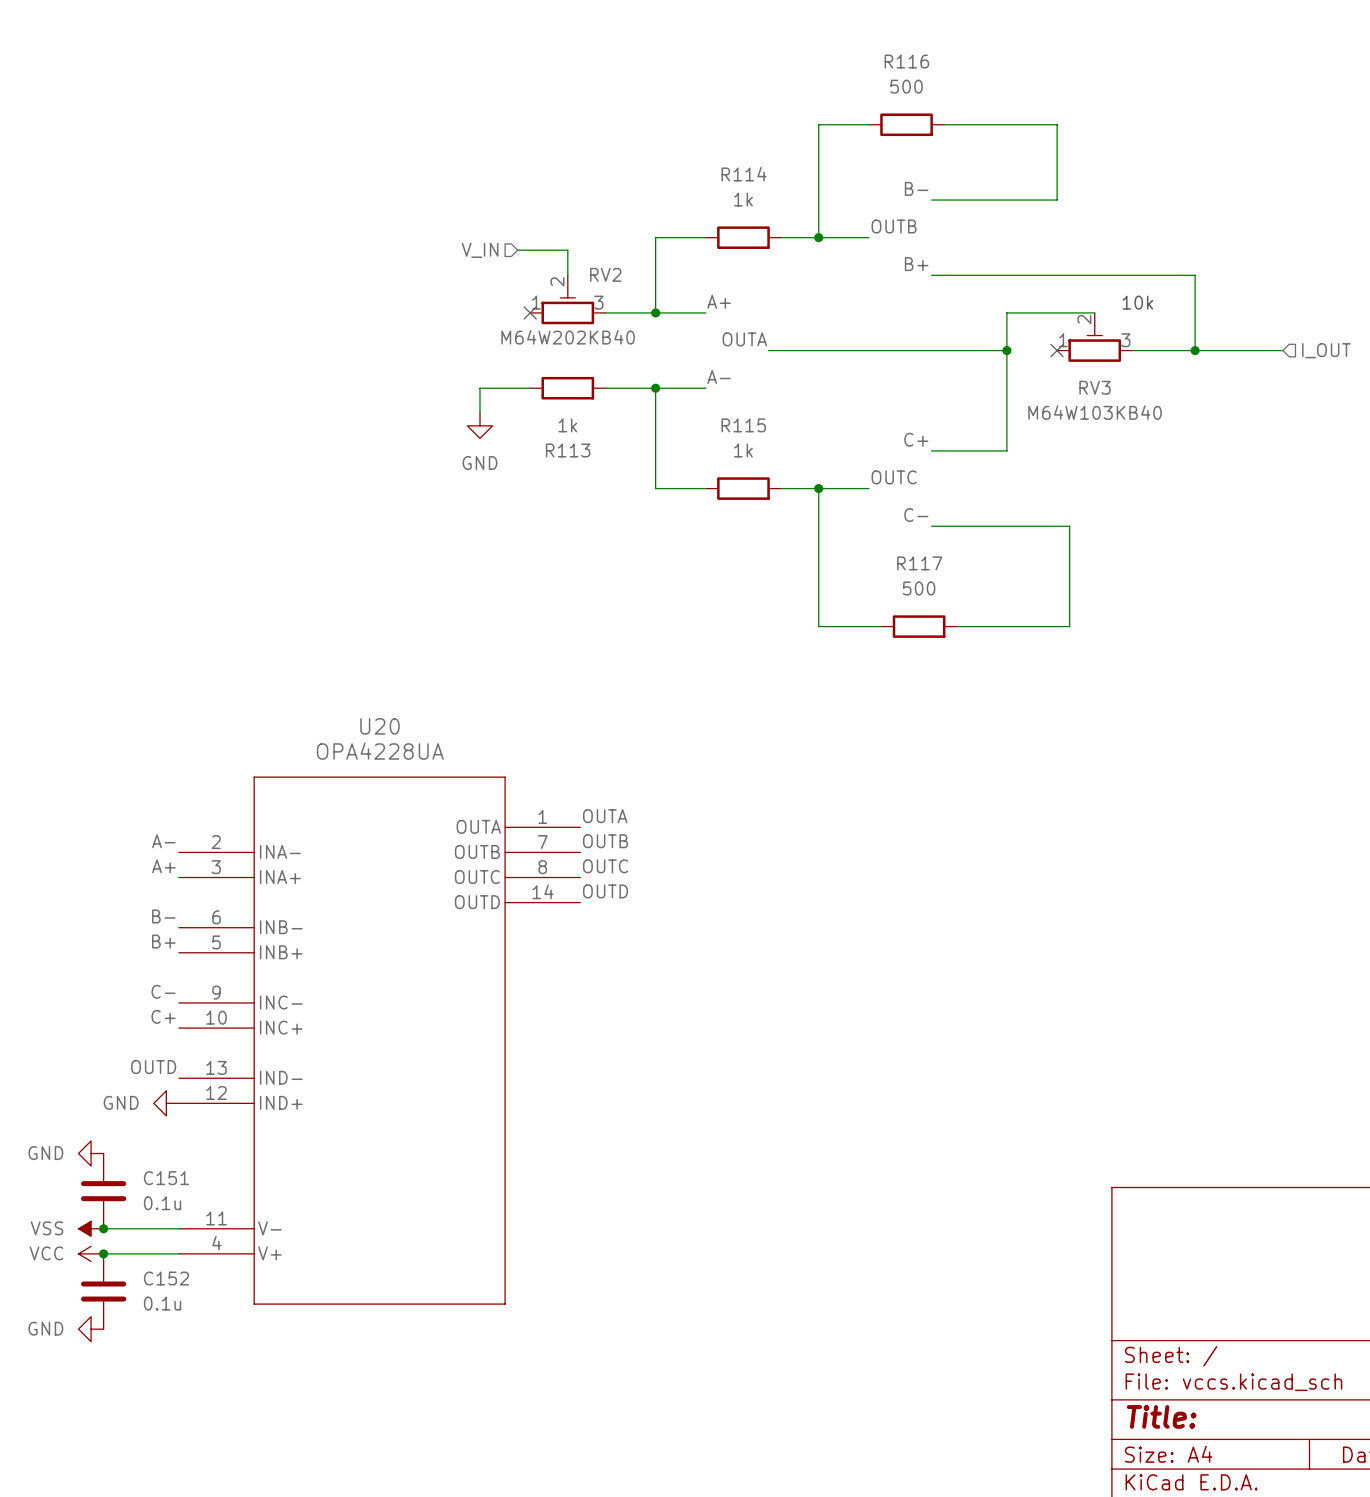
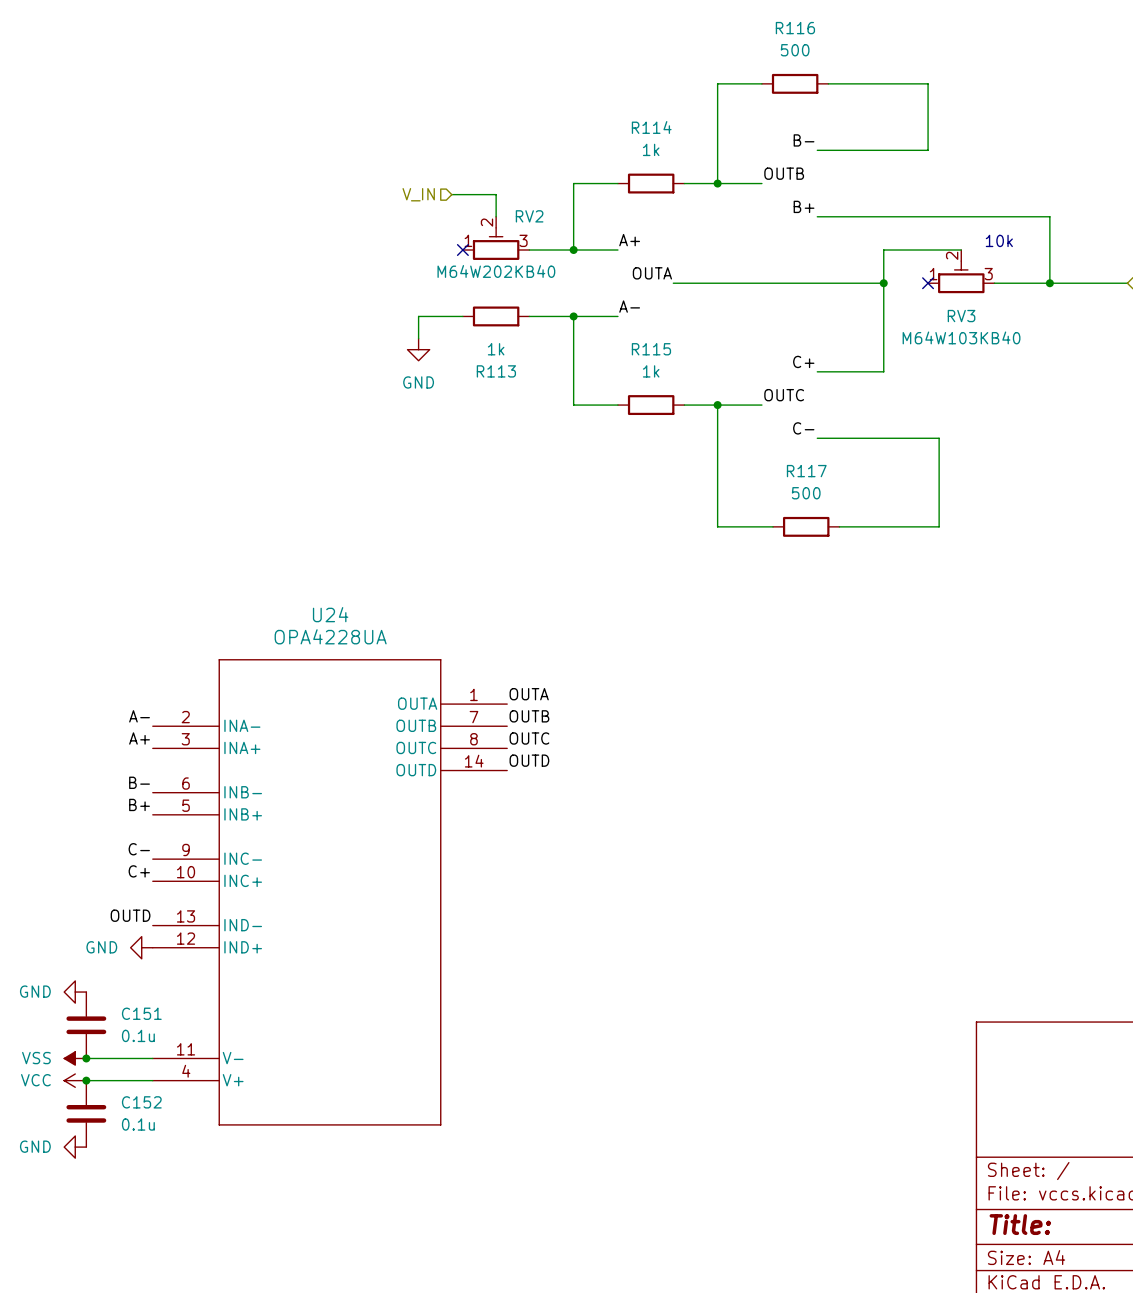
U20 name: U20 (379, 726) -> U24 (330, 614)

